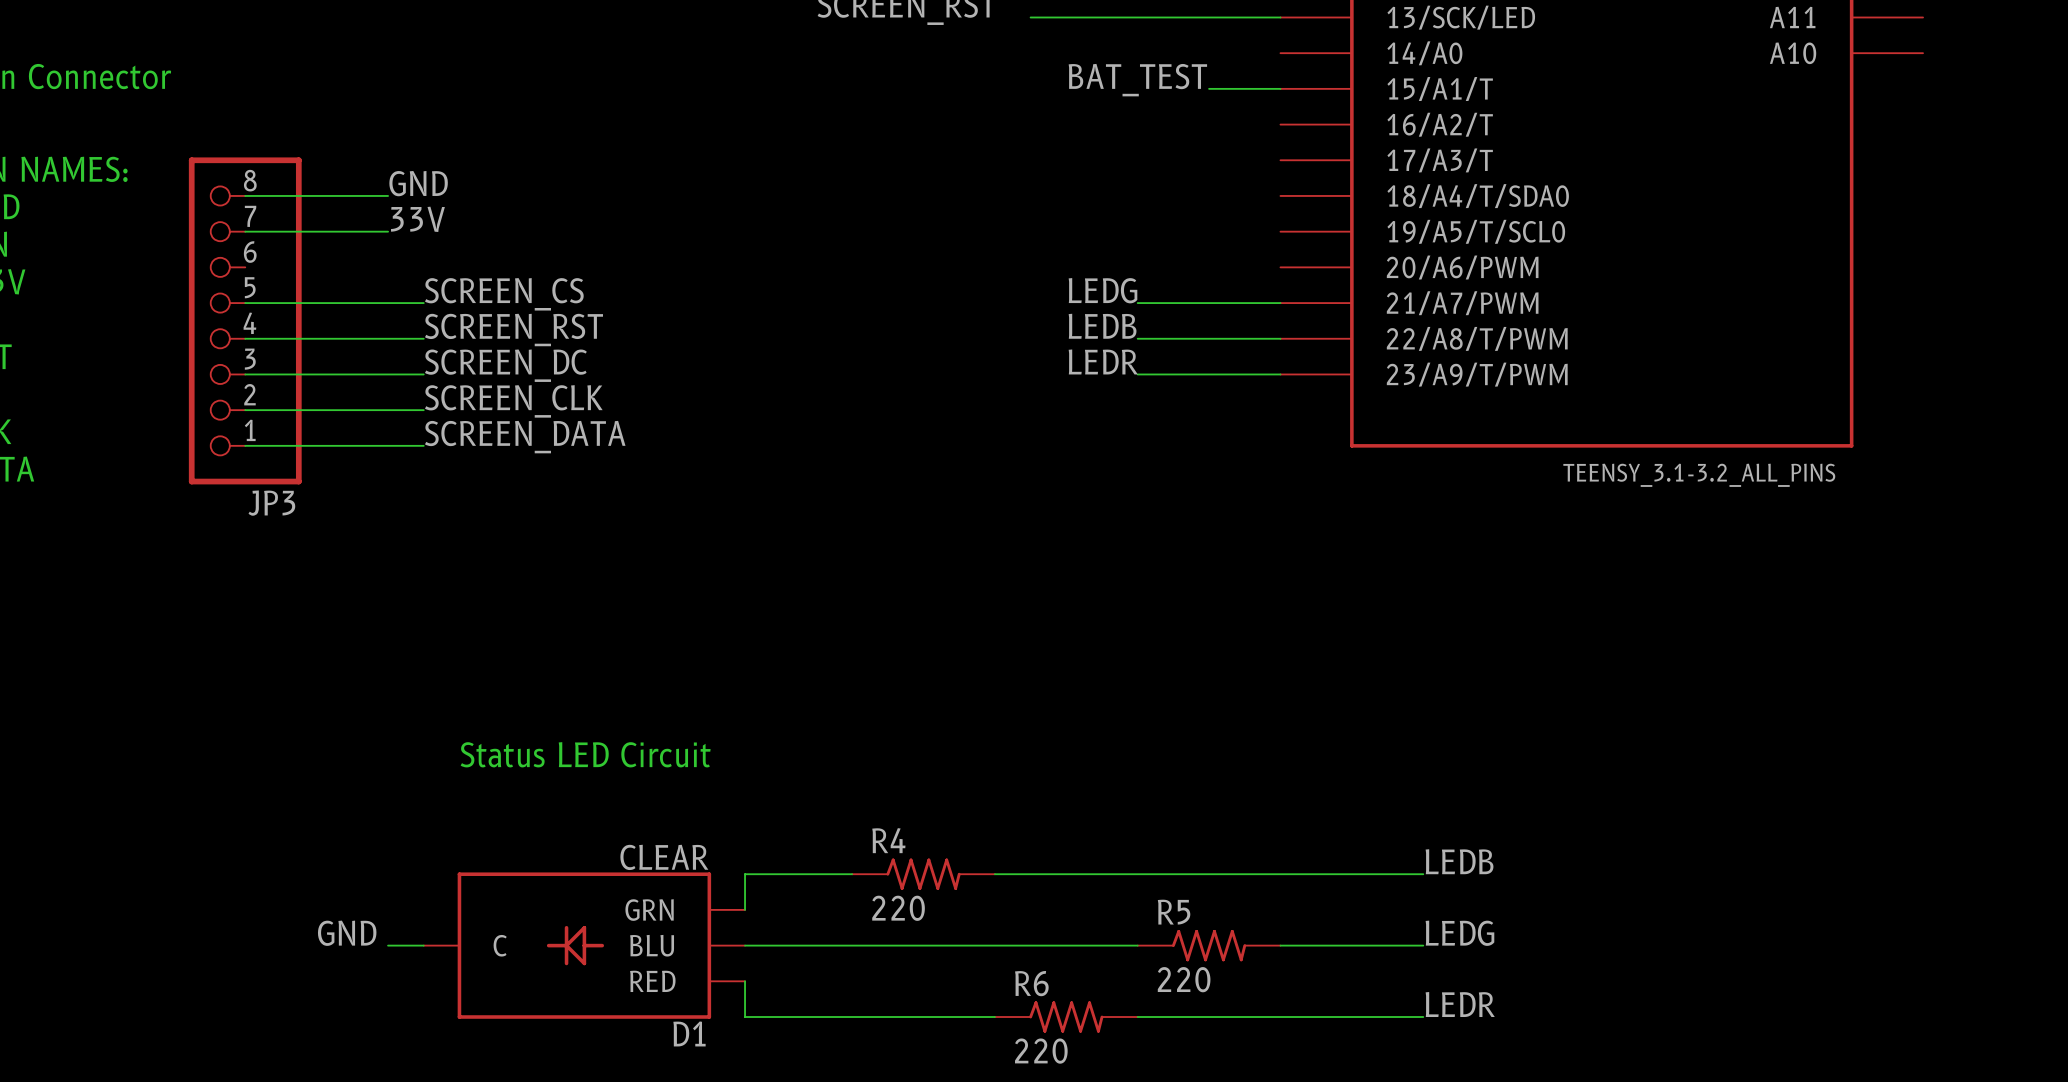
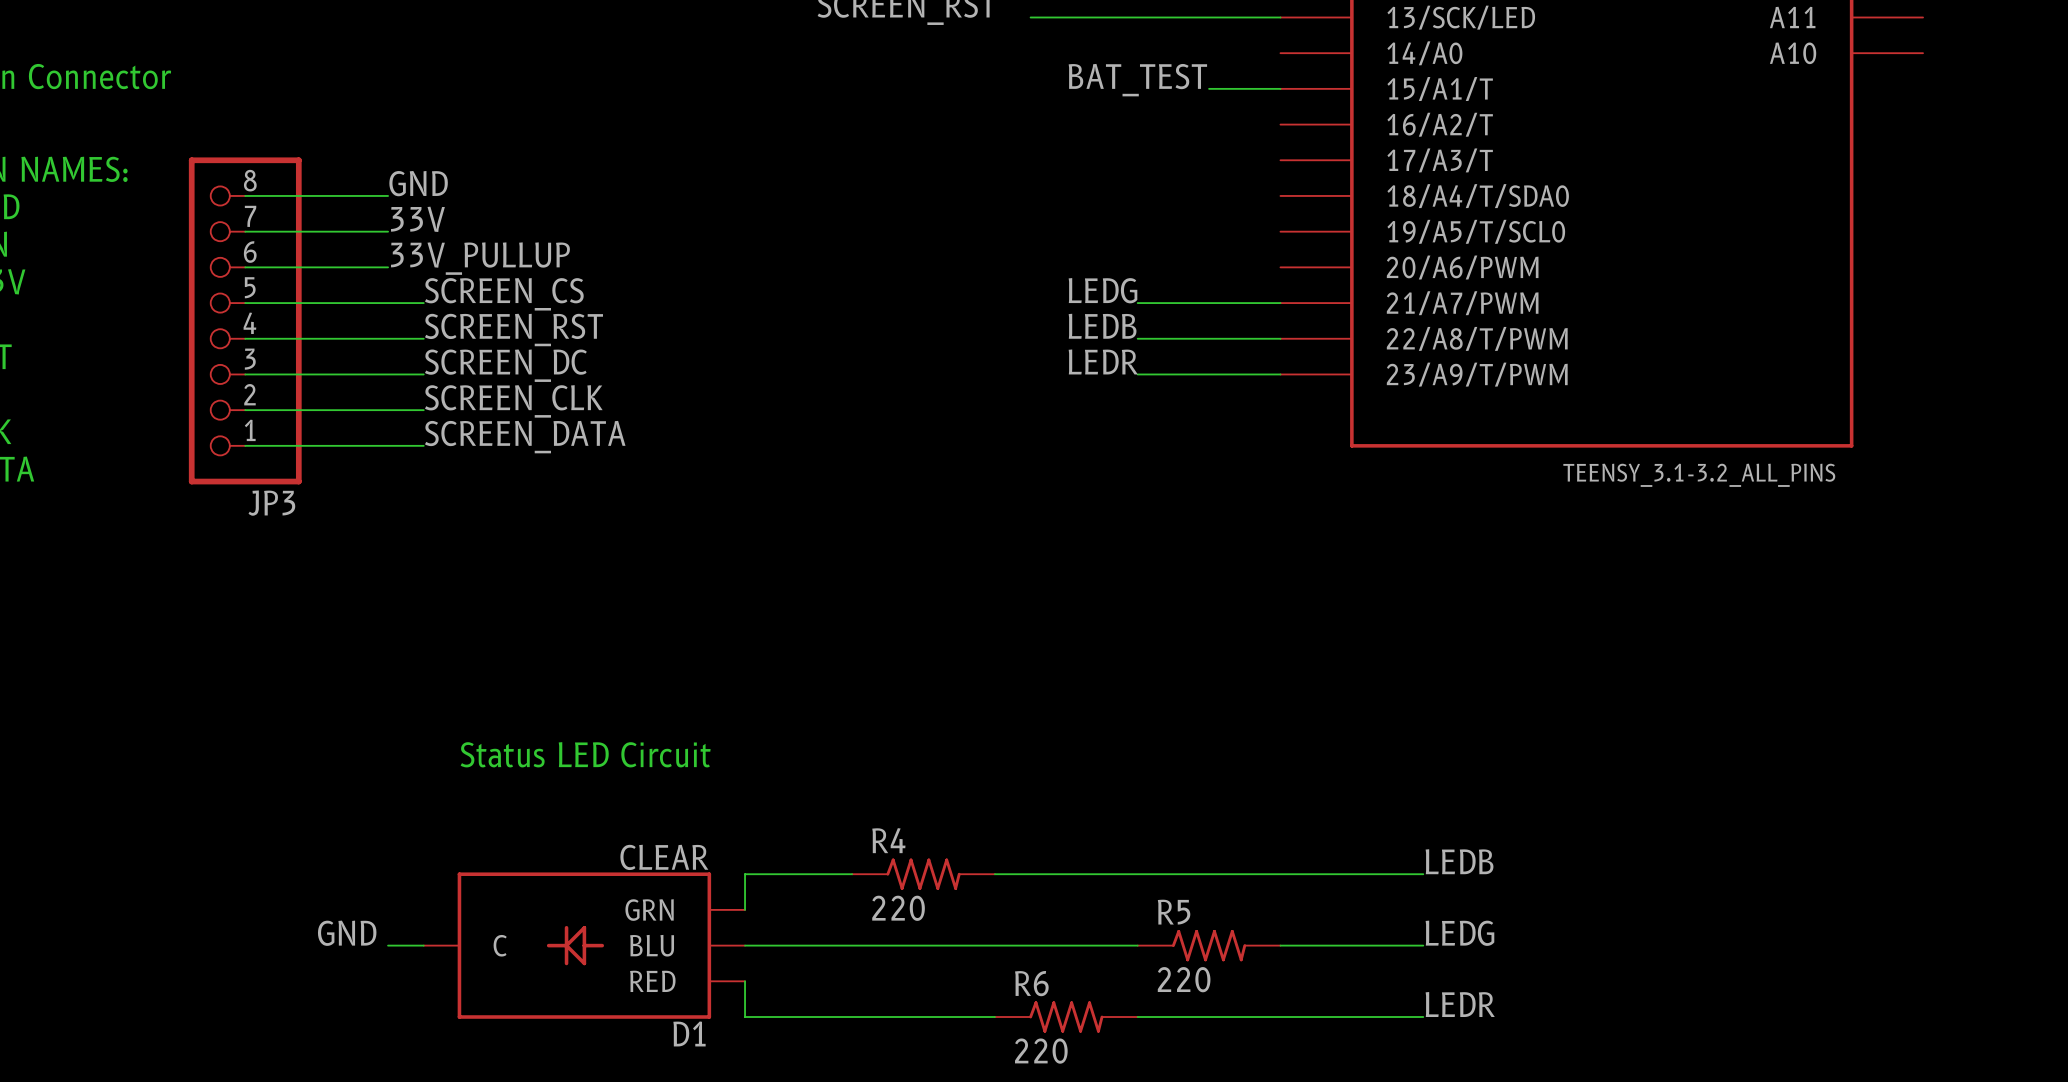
label: none -> 33V_PULLUP (480, 258)
wire: none -> (245, 267) (388, 267)

